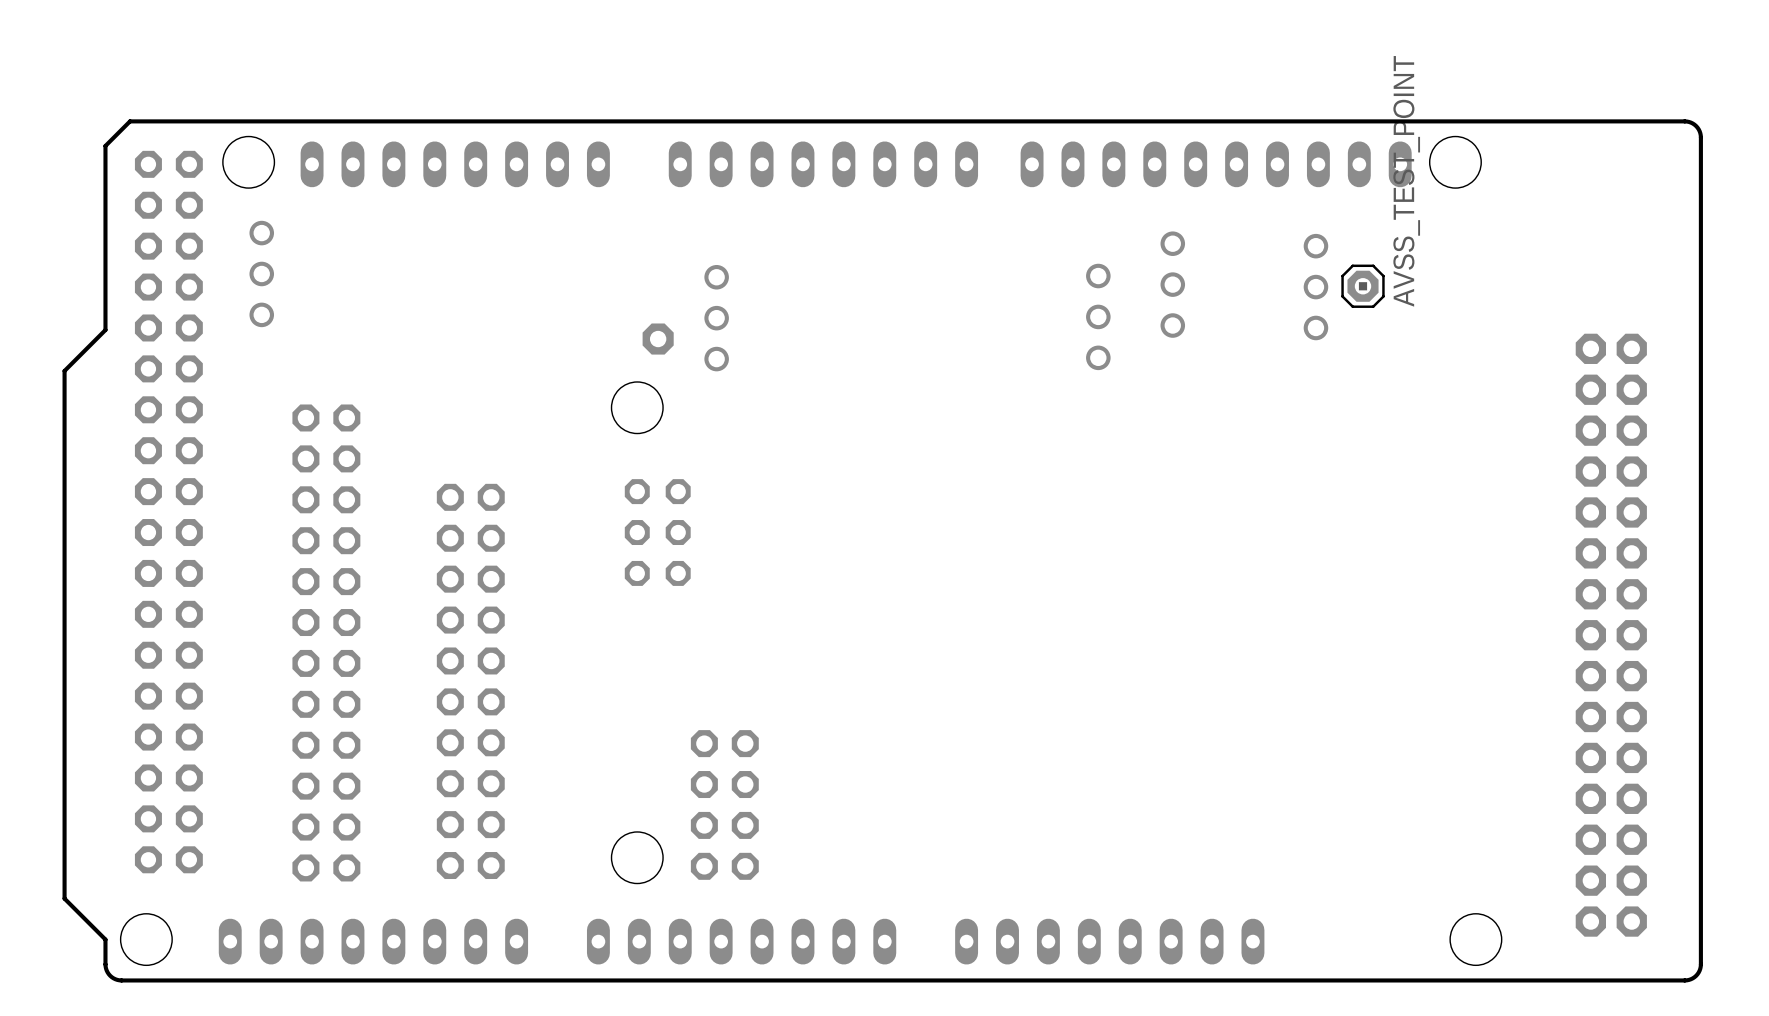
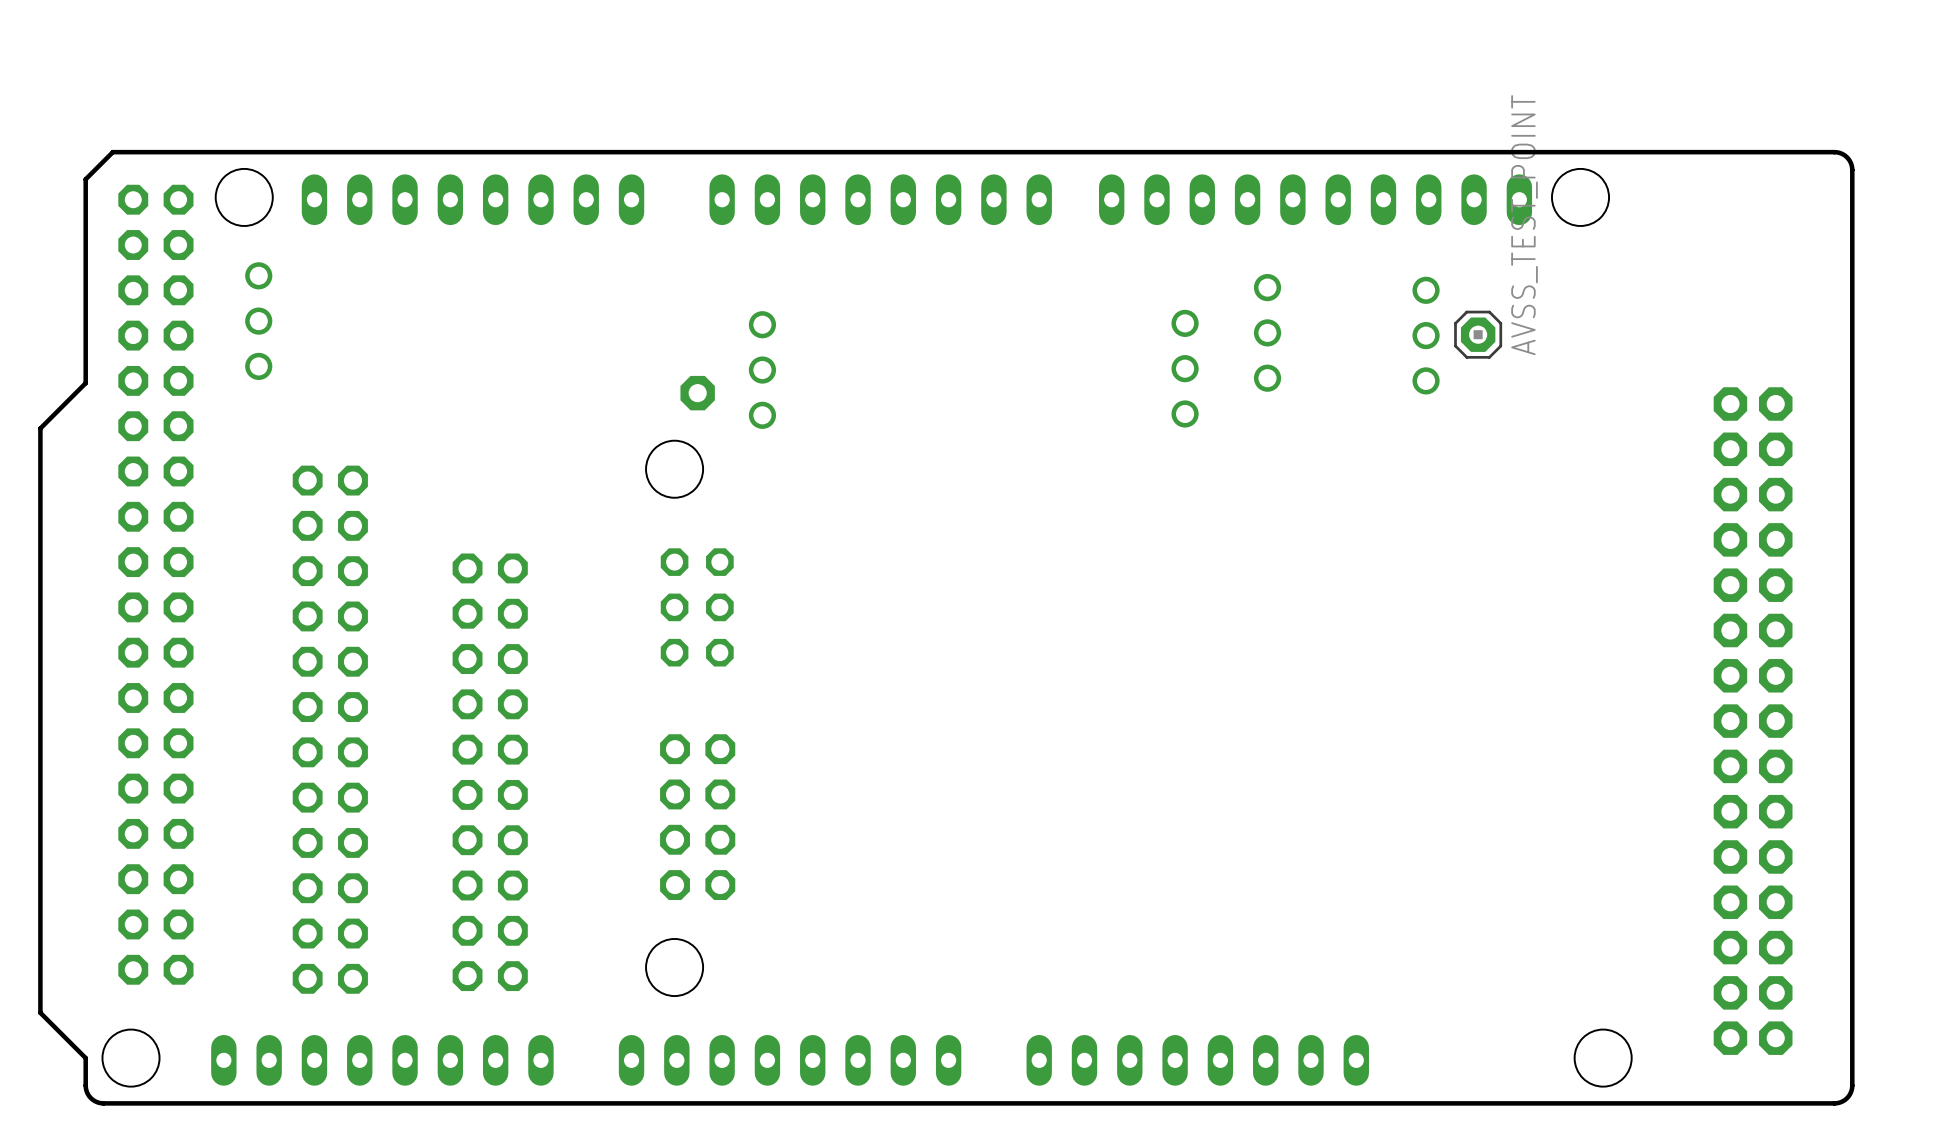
part position: (724, 804) -> (697, 817)

